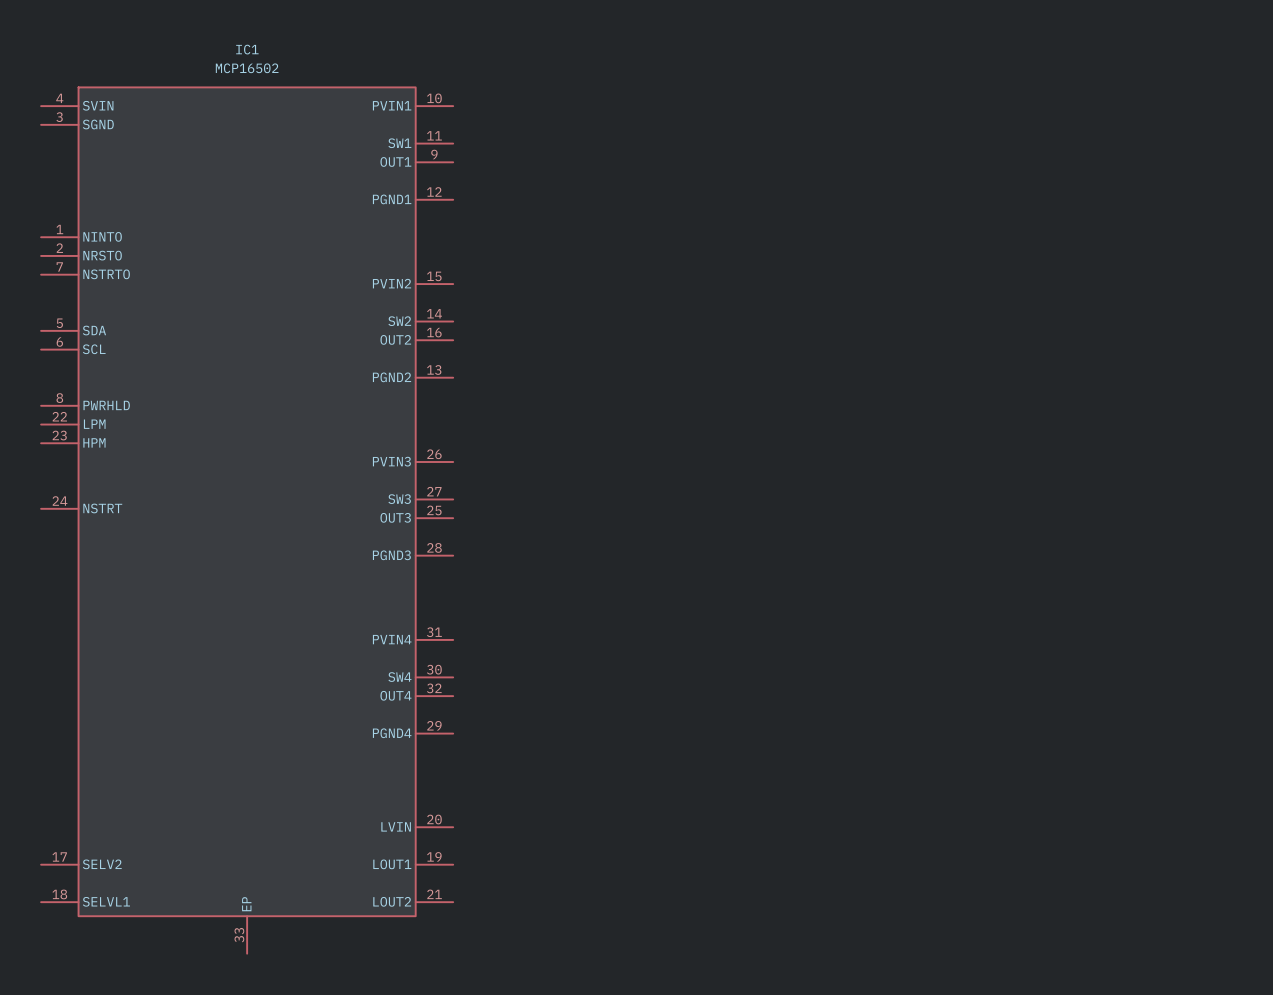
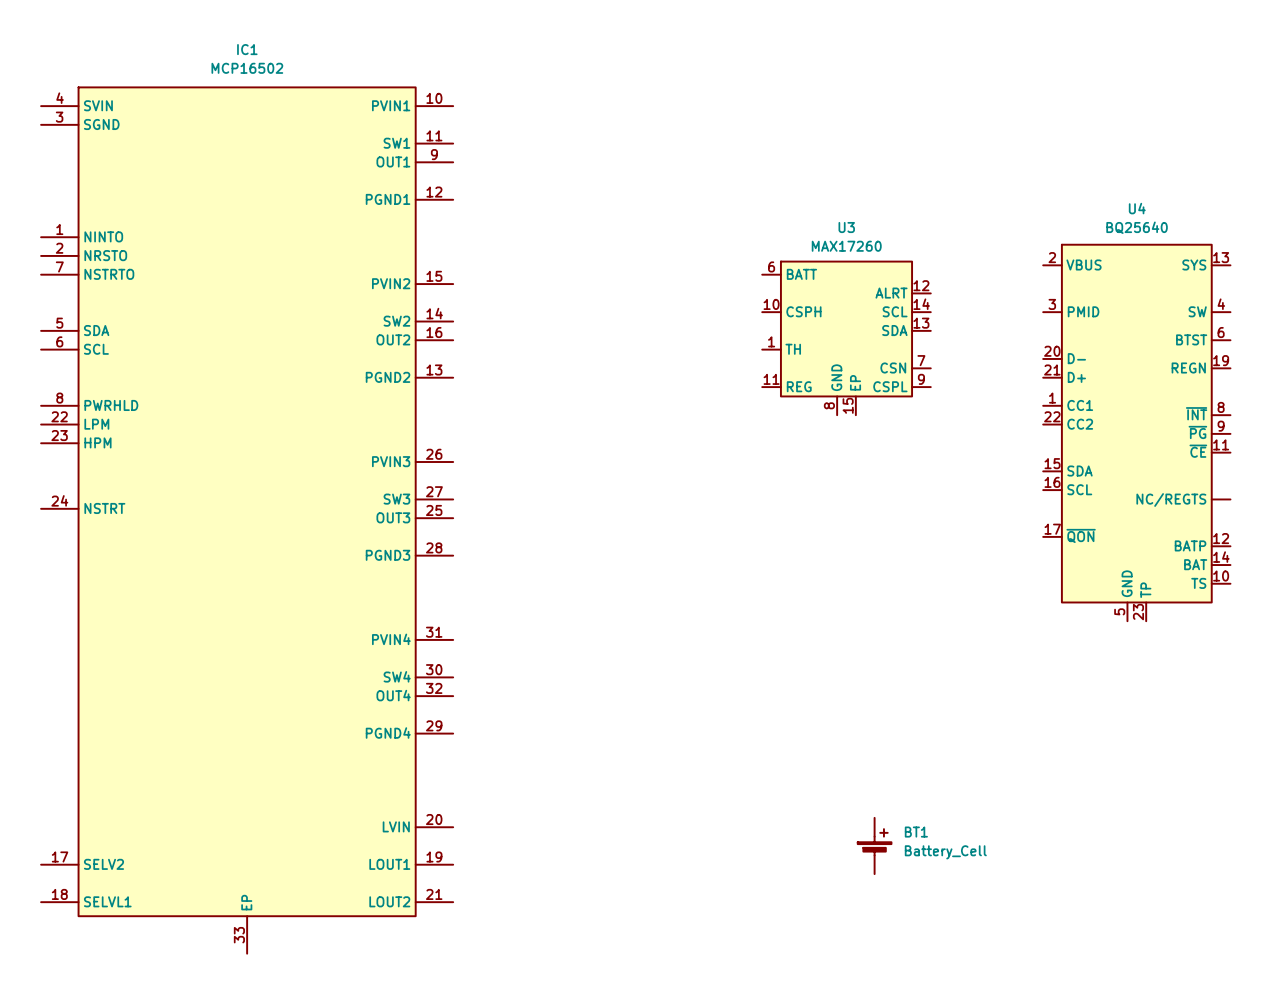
U3: none -> MAX17260 (846, 338)
U4: none -> BQ25640 (1136, 432)
BT1: none -> Battery_Cell (874, 845)

